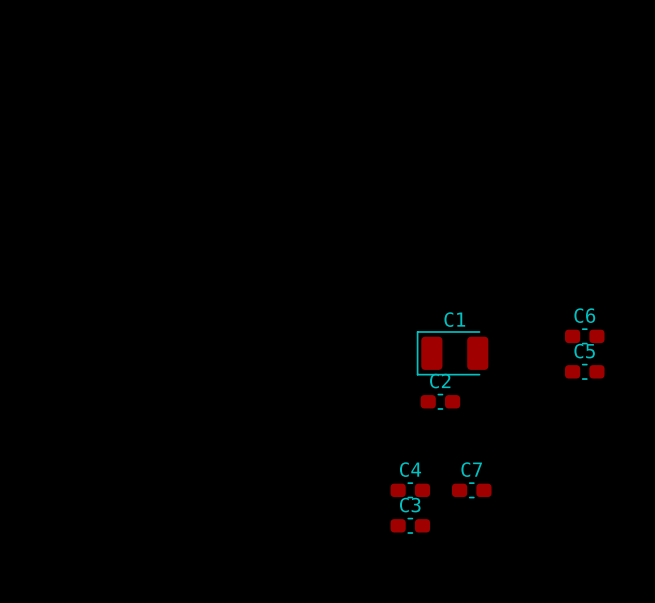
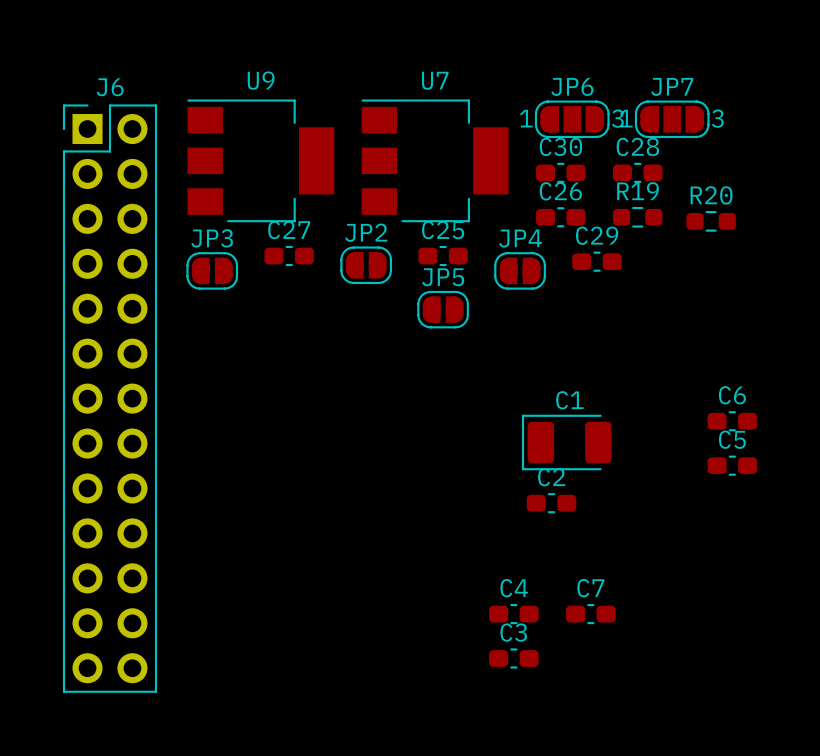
JP6: none -> (572, 119)
JP7: none -> (672, 119)
U9: none -> (260, 160)
U7: none -> (435, 160)
C30: none -> (560, 172)
C28: none -> (637, 172)
C26: none -> (560, 217)
R19: none -> (637, 217)
R20: none -> (711, 221)
C27: none -> (289, 256)
C25: none -> (443, 256)
C29: none -> (597, 261)
JP2: none -> (366, 265)
JP3: none -> (212, 270)
JP4: none -> (520, 270)
JP5: none -> (443, 309)
J6: none -> (109, 398)

